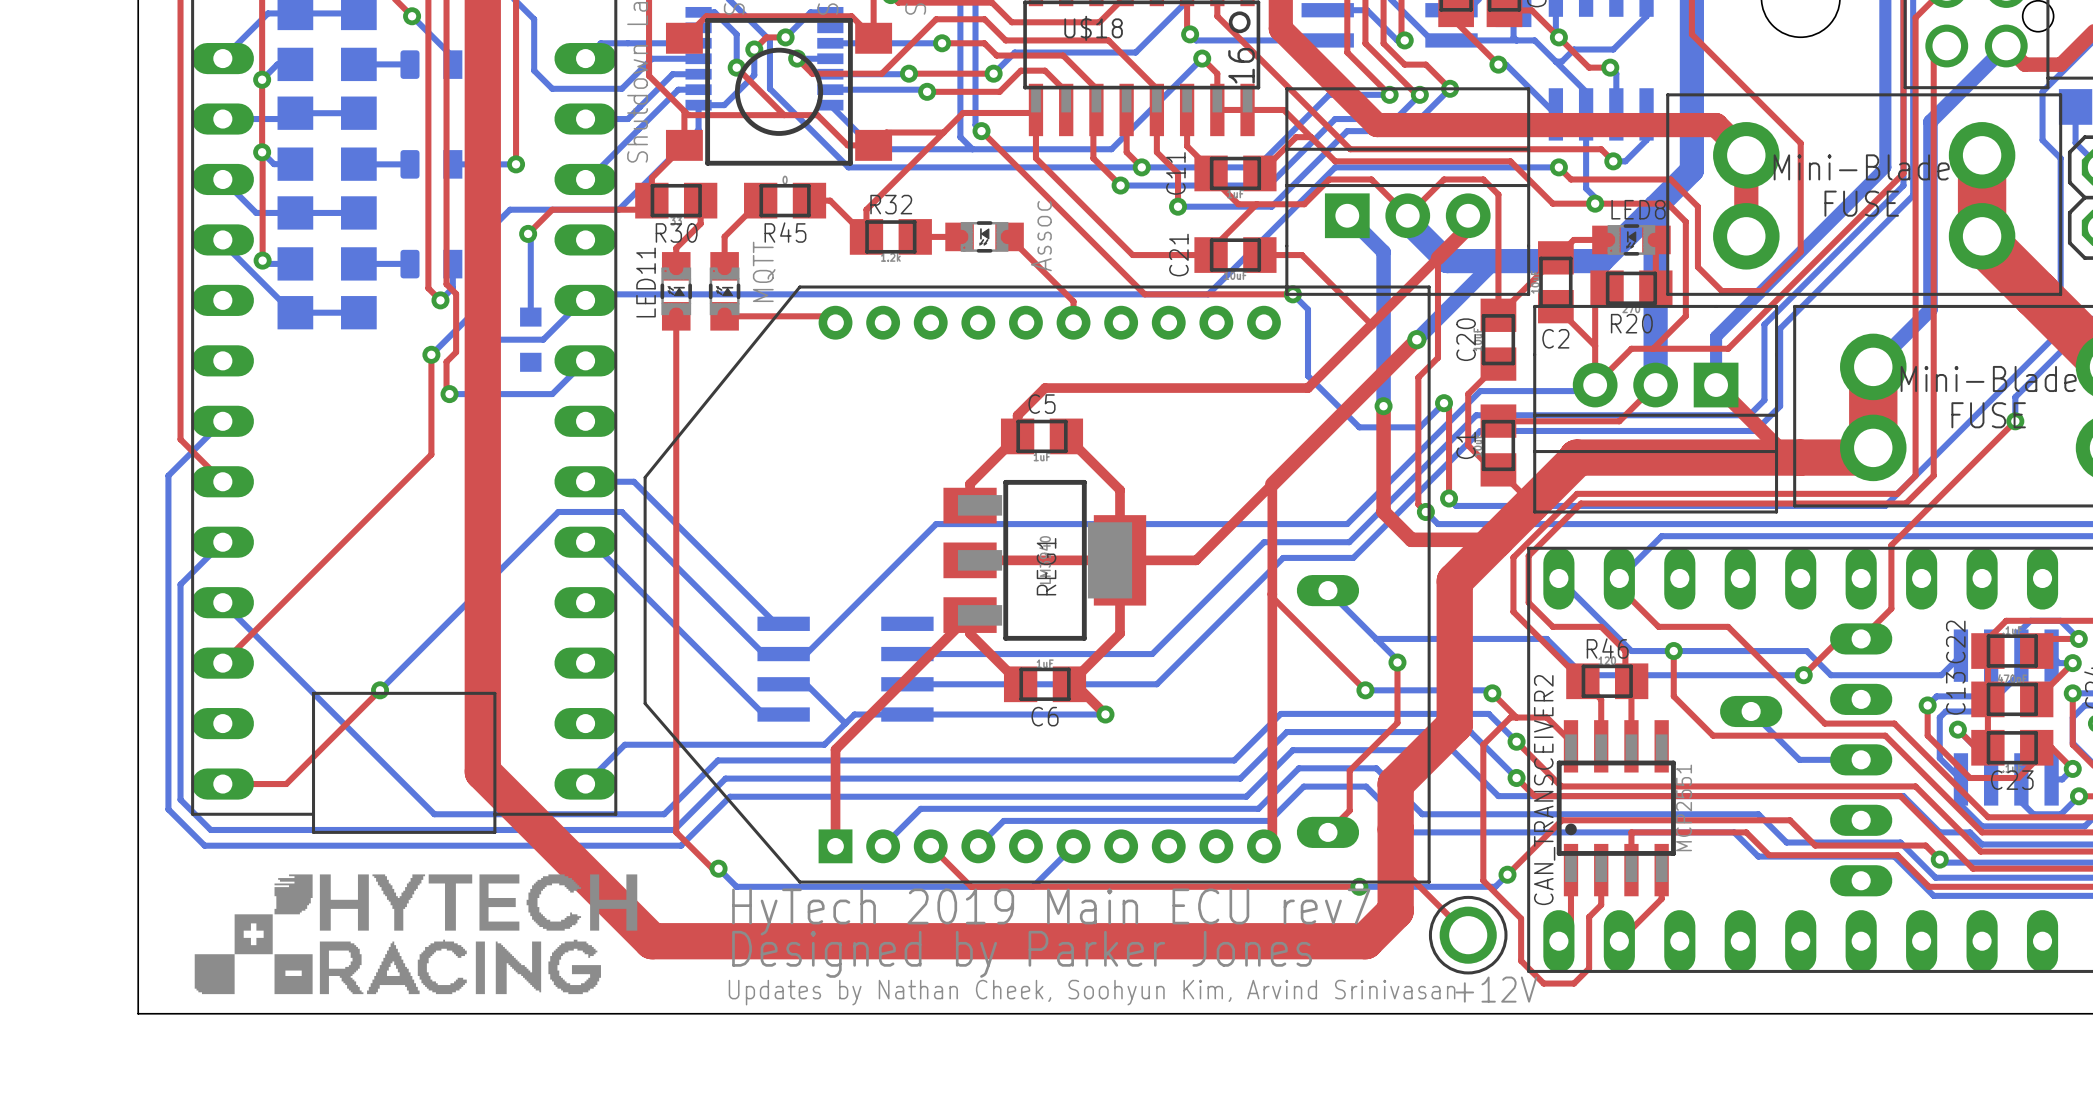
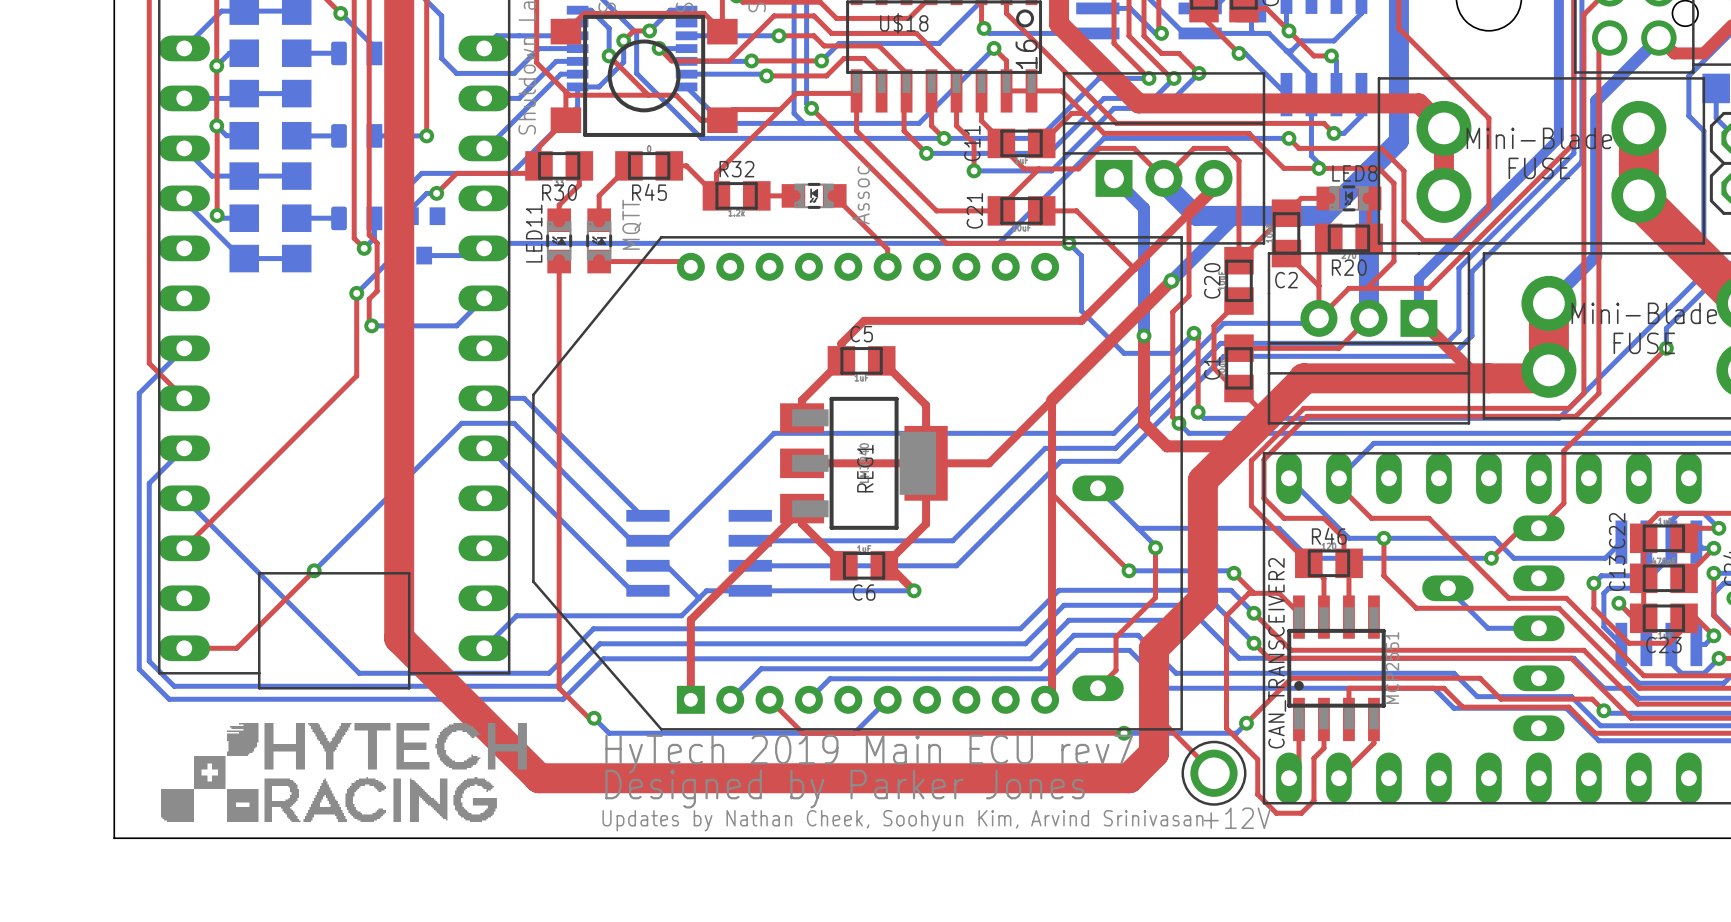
bottom track: (528, 233) (530, 236) (530, 317) -> (436, 193) (426, 193) (410, 209) (410, 216)
part: none -> (424, 235)
bottom track: (585, 300) (582, 300) (543, 339) (483, 339) -> (484, 248) (476, 255) (424, 255)
part: (506, 339) -> none

